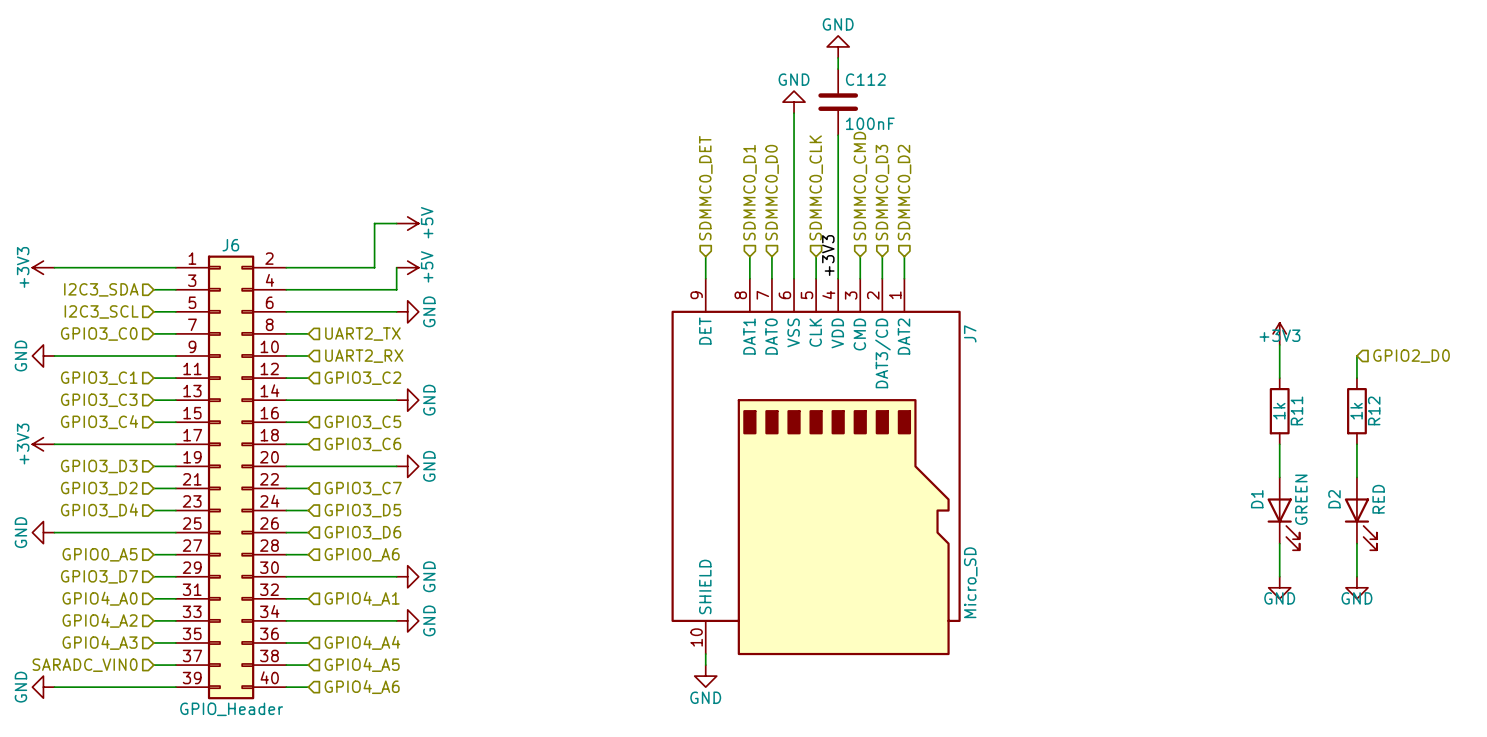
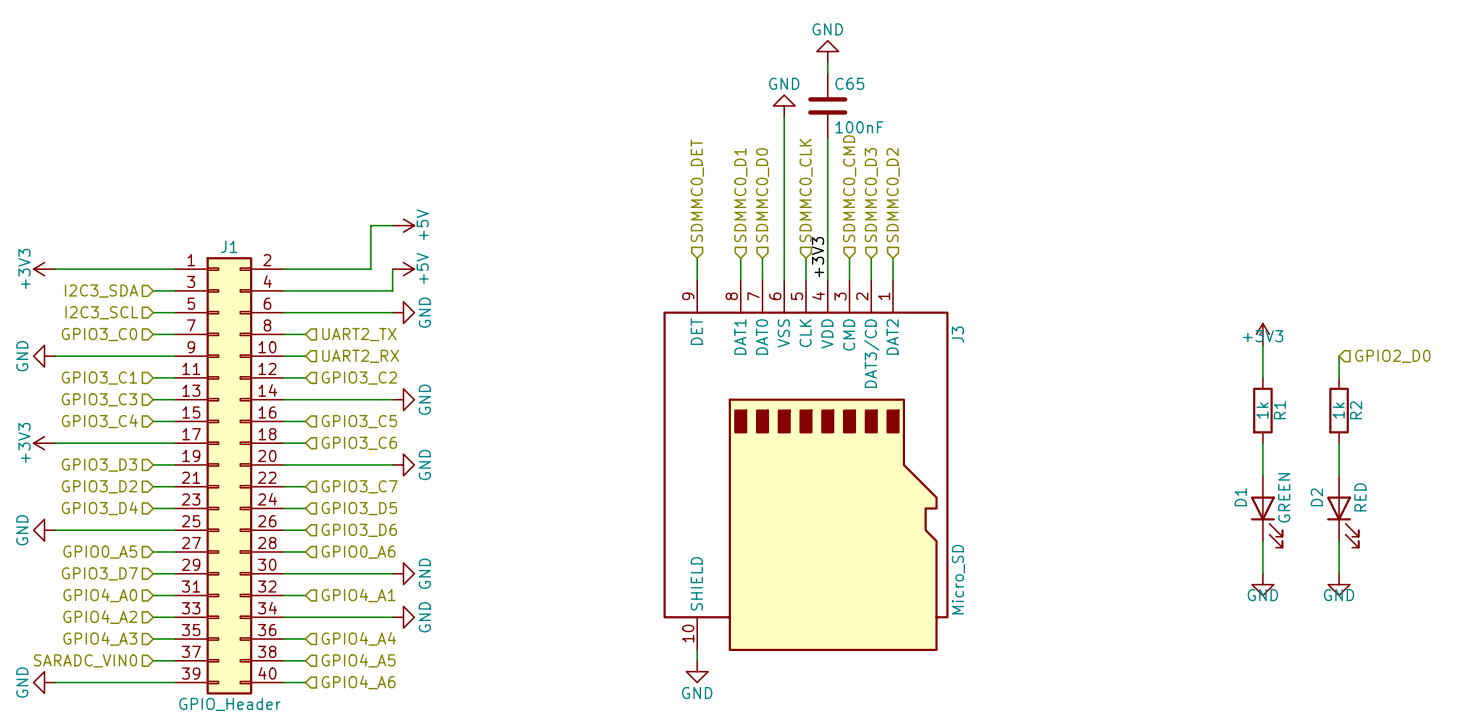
C112 name: C112 (865, 79) -> C65 (849, 83)
J6 name: J6 (230, 245) -> J1 (229, 246)
J7 name: J7 (970, 333) -> J3 (957, 334)
R11 name: R11 (1296, 410) -> R1 (1279, 410)
R12 name: R12 (1374, 410) -> R2 (1356, 410)

